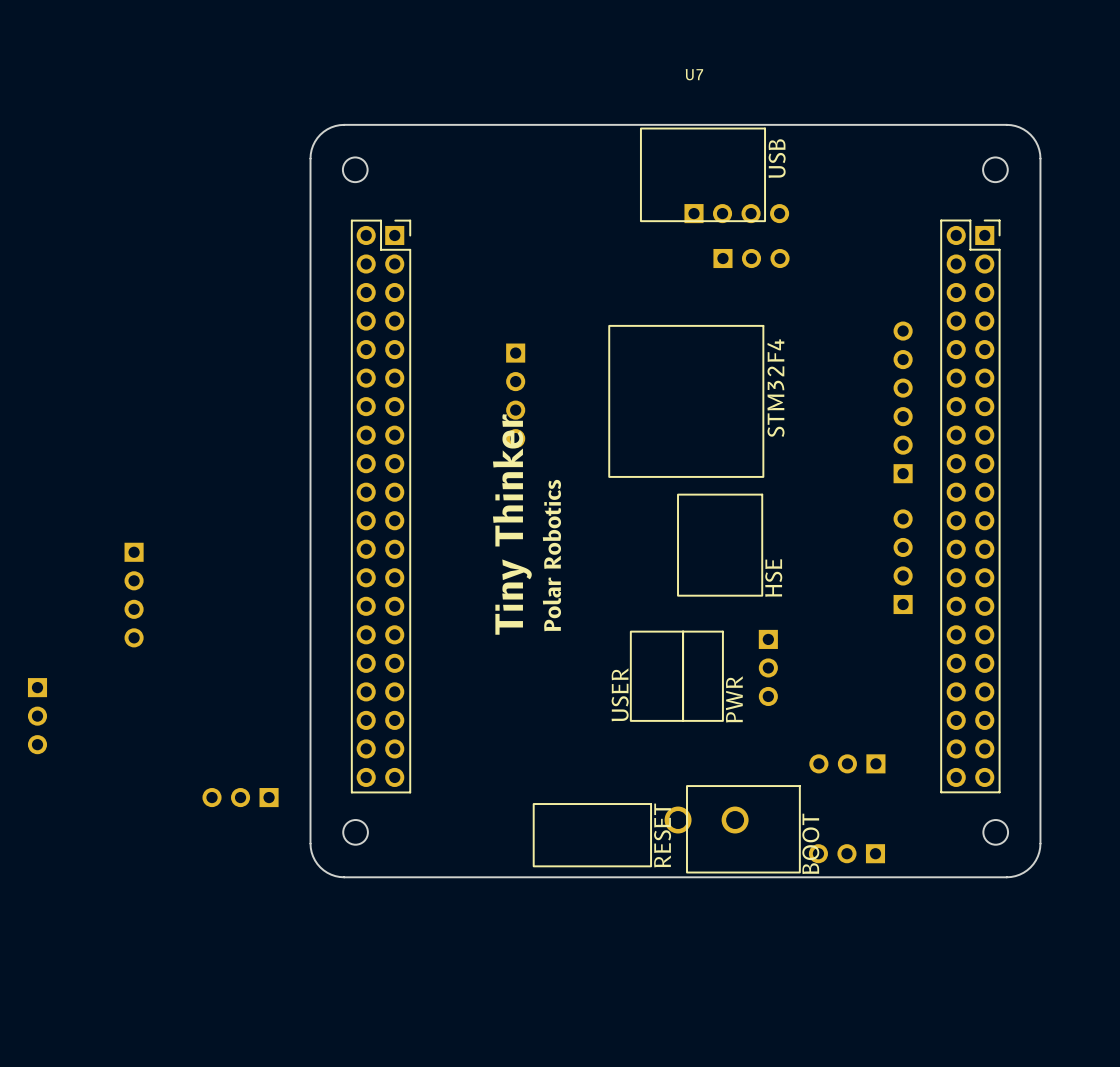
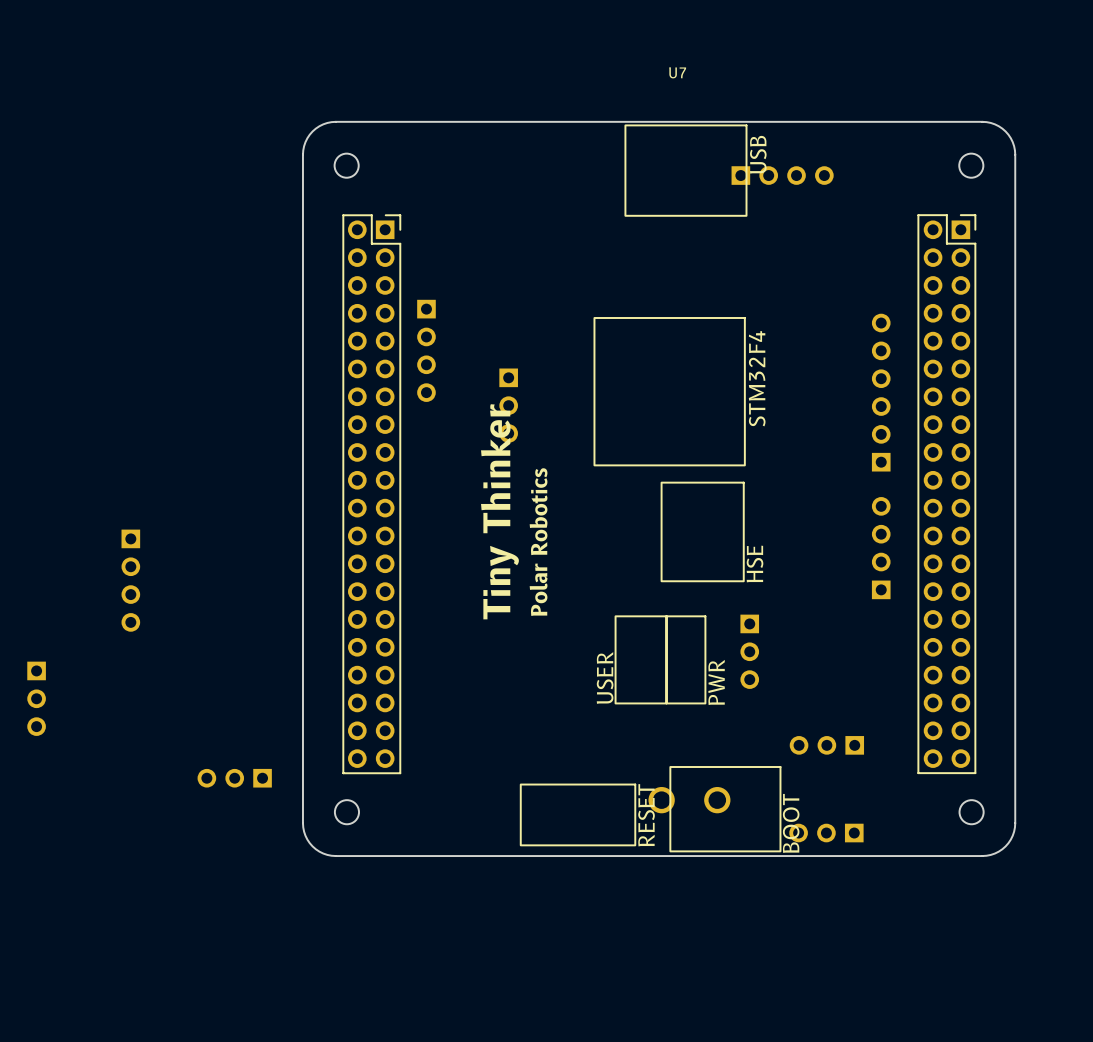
part position: (736, 213) -> (782, 175)
part rotation: 0° (751, 258) -> 90° clockwise (508, 405)
part position: (751, 258) -> (508, 405)
part position: (515, 395) -> (426, 350)

